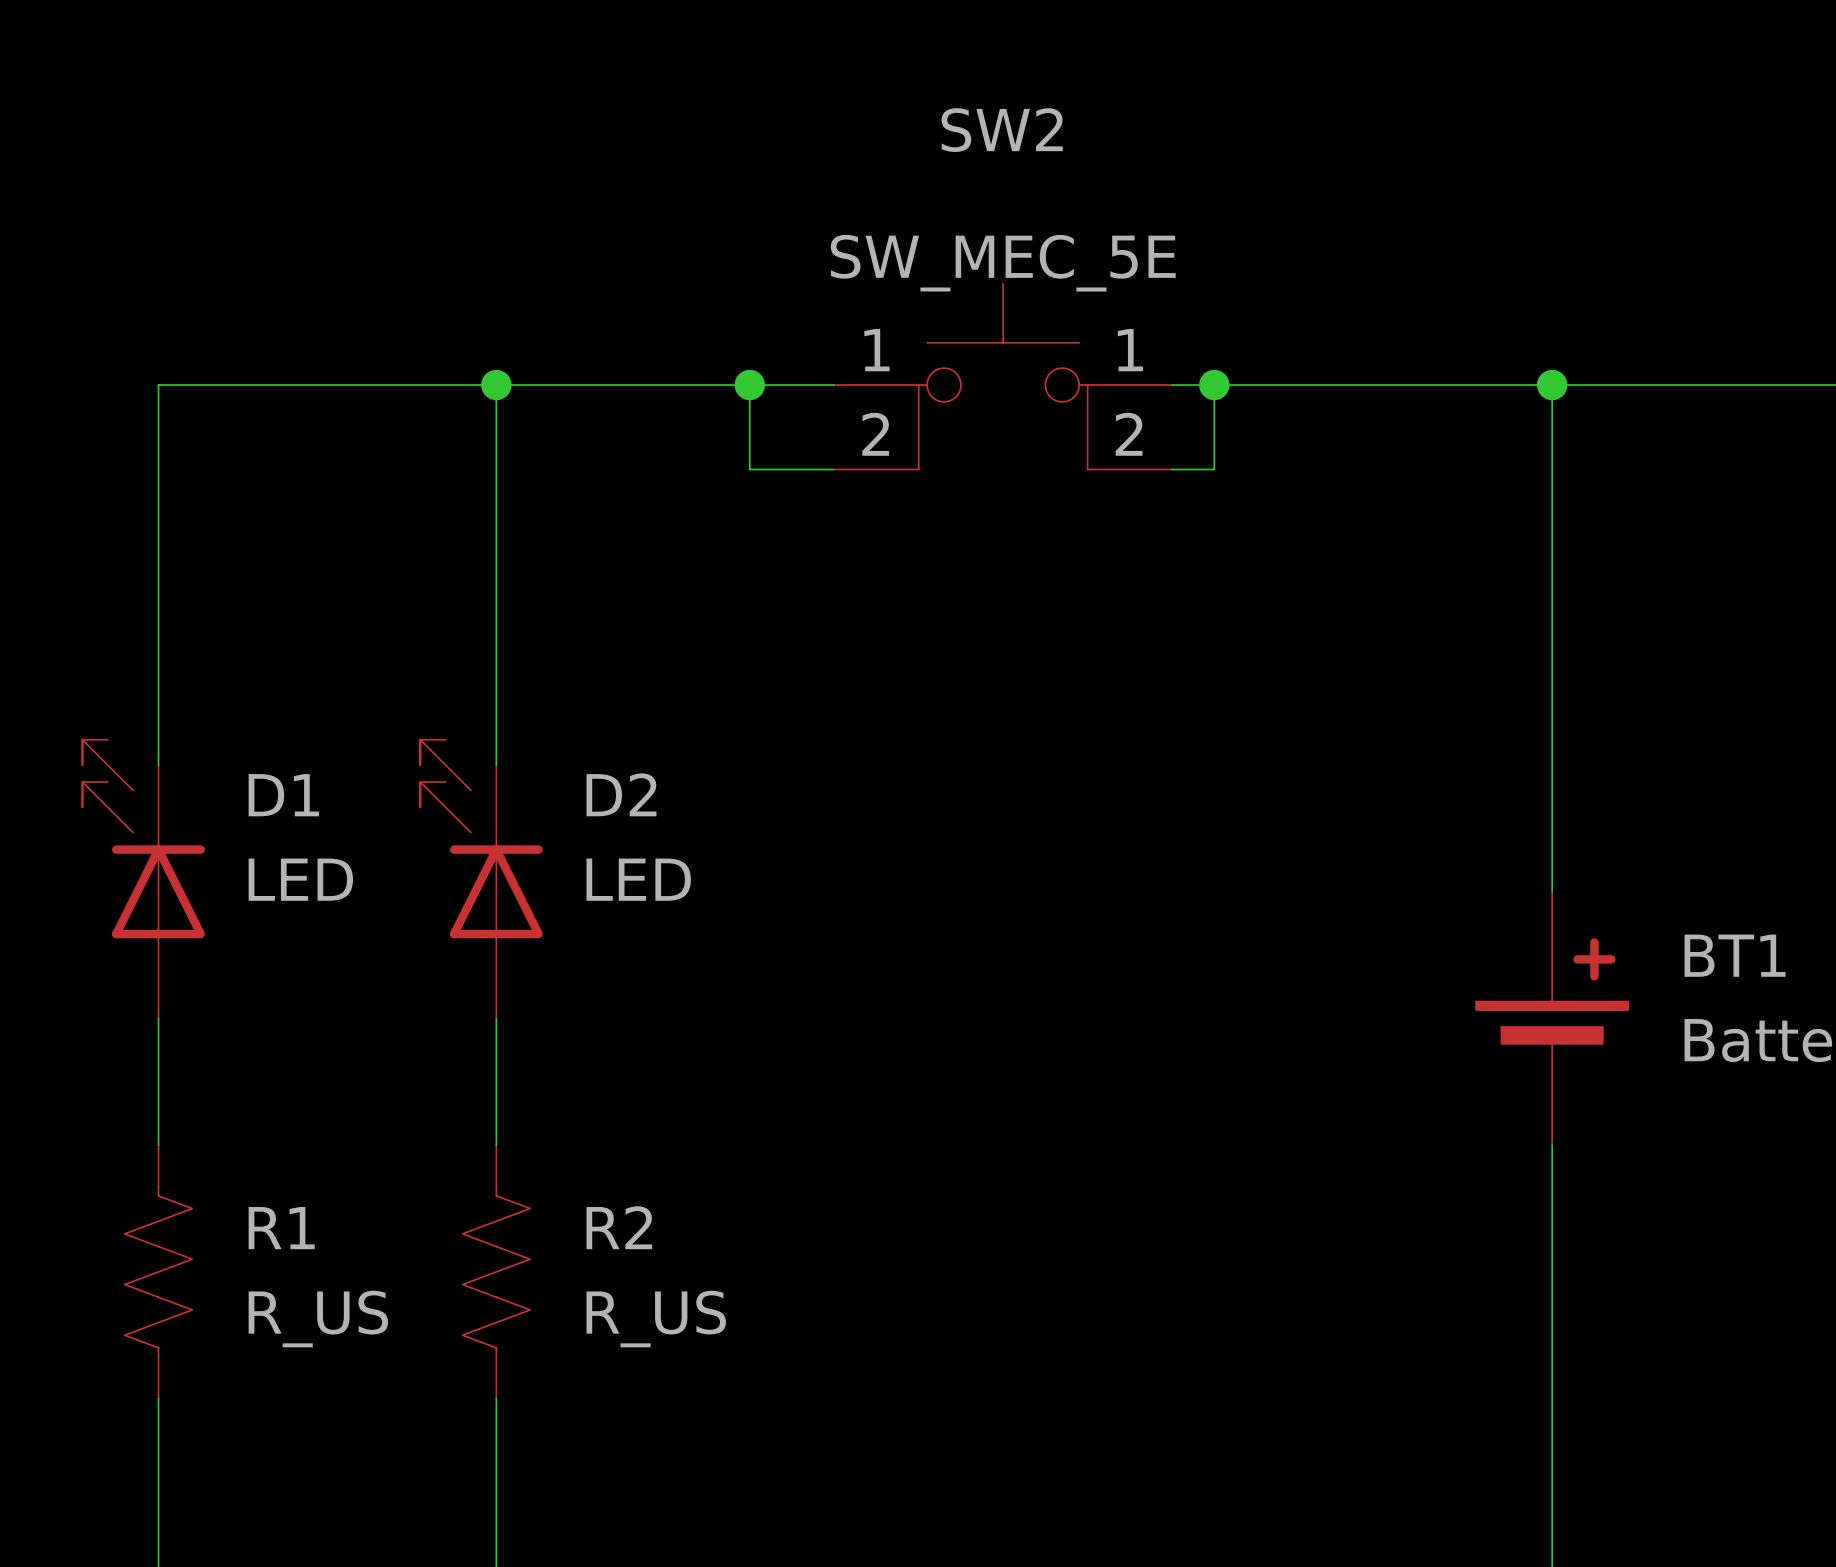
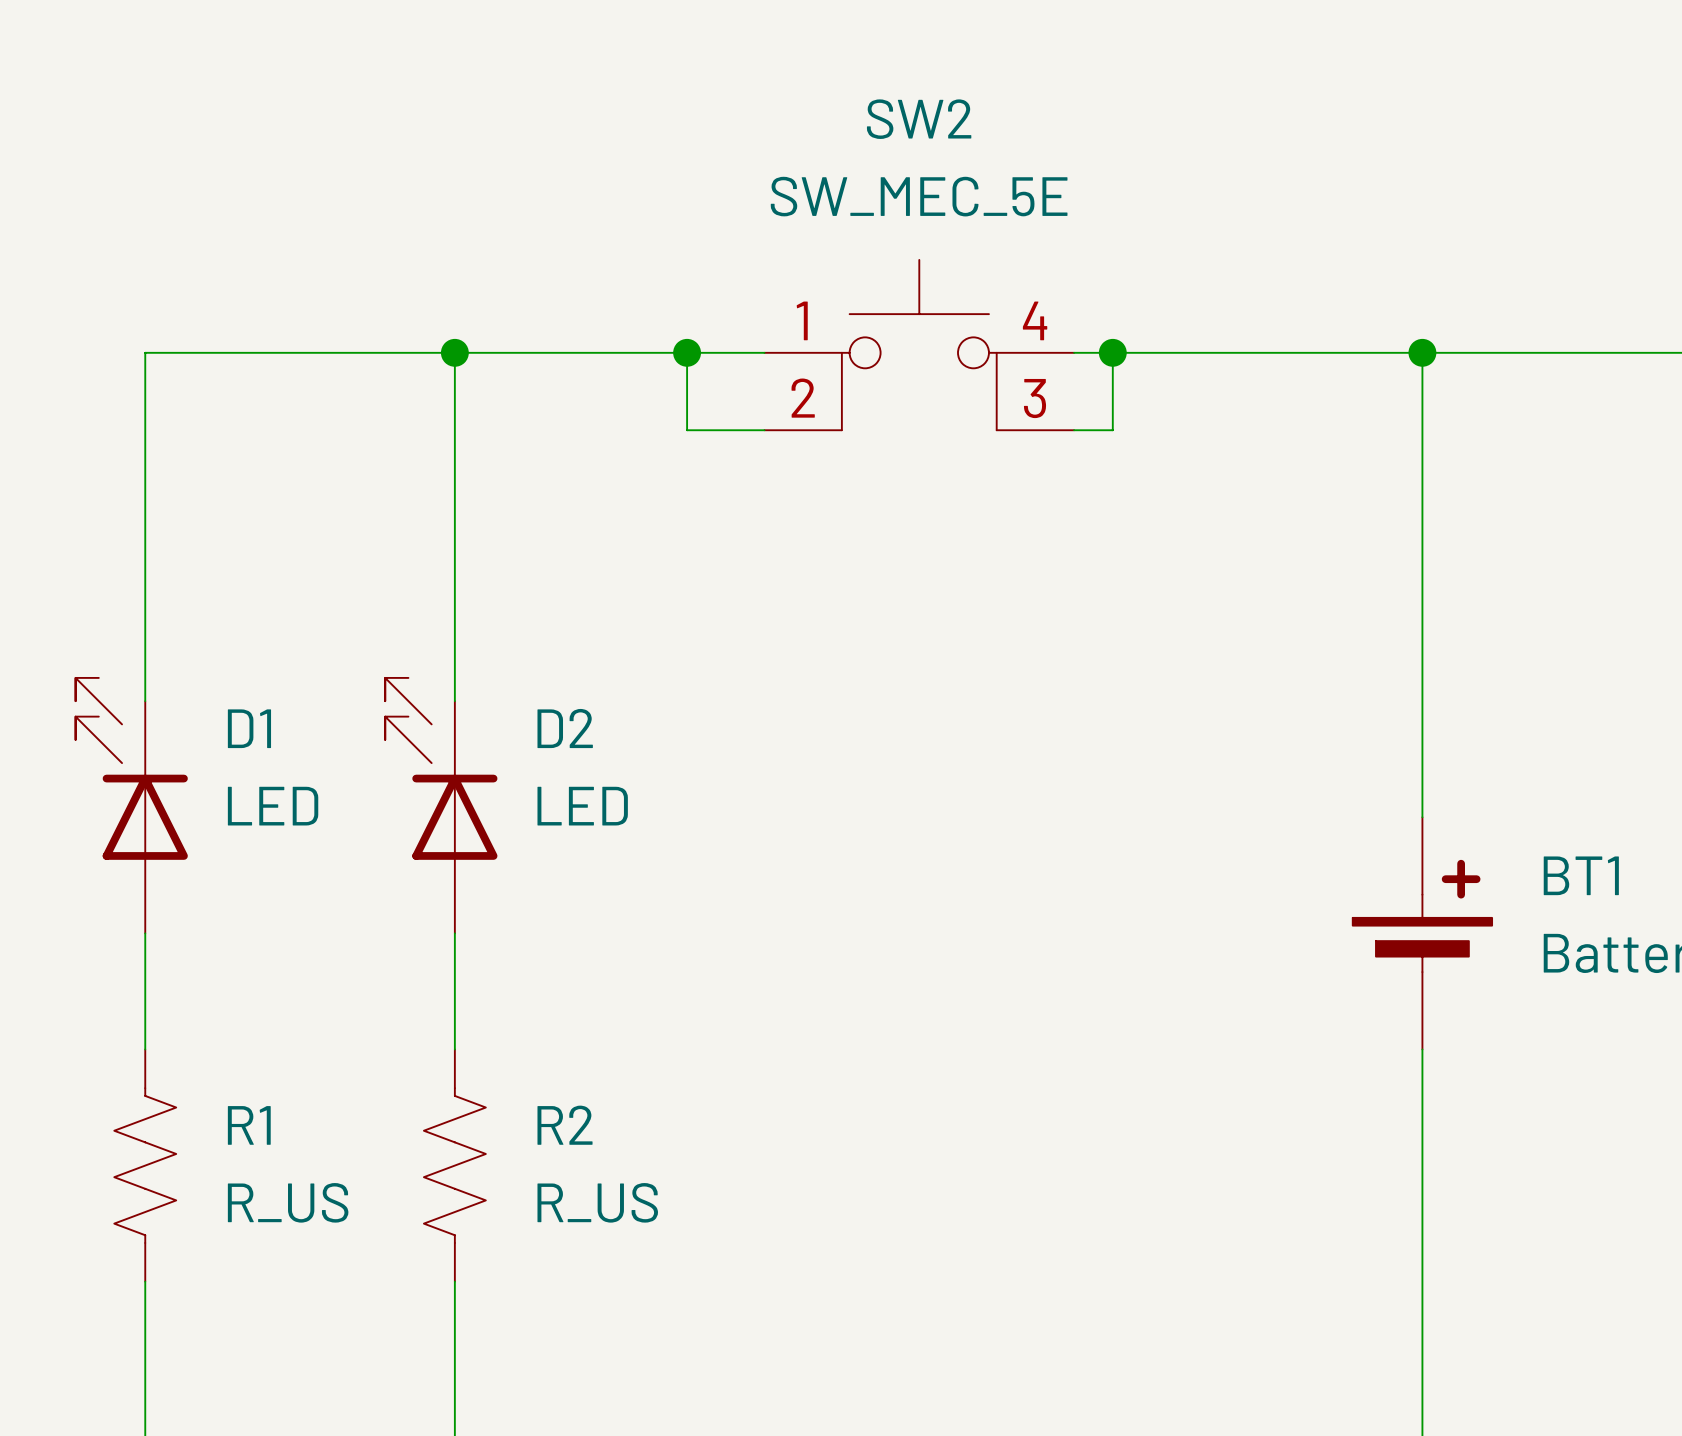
SW2 value position: SW_MEC_5E (1003, 263) -> SW_MEC_5E (919, 196)
SW2 pin number: 1 (1130, 350) -> 4 (1035, 320)
SW2 pin number: 2 (1129, 434) -> 3 (1034, 398)

